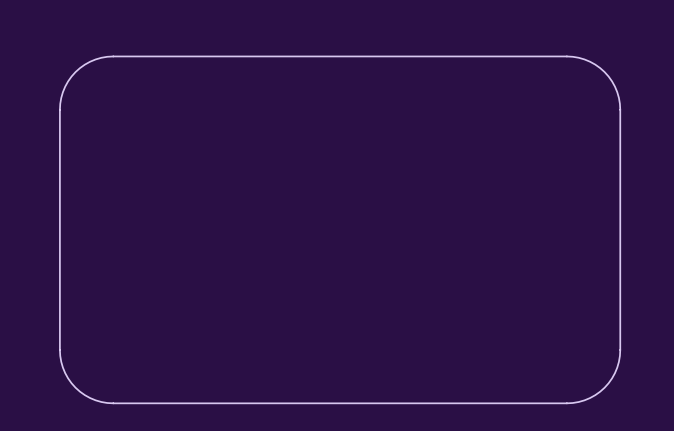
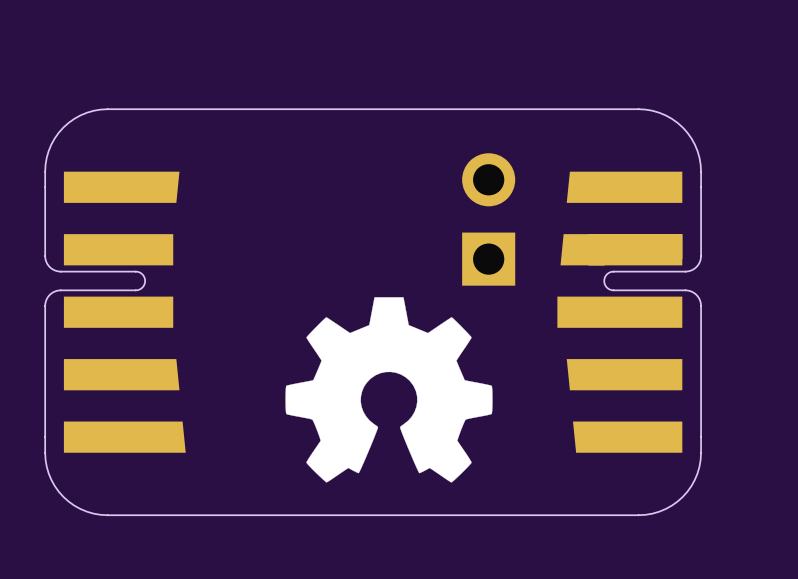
board edge: (59, 123) (59, 336) -> none
board edge: (620, 123) (620, 336) -> none
part: none -> (488, 219)
drawing: none -> [285, 297, 493, 483]
part: none -> (115, 312)
part: none -> (629, 312)

